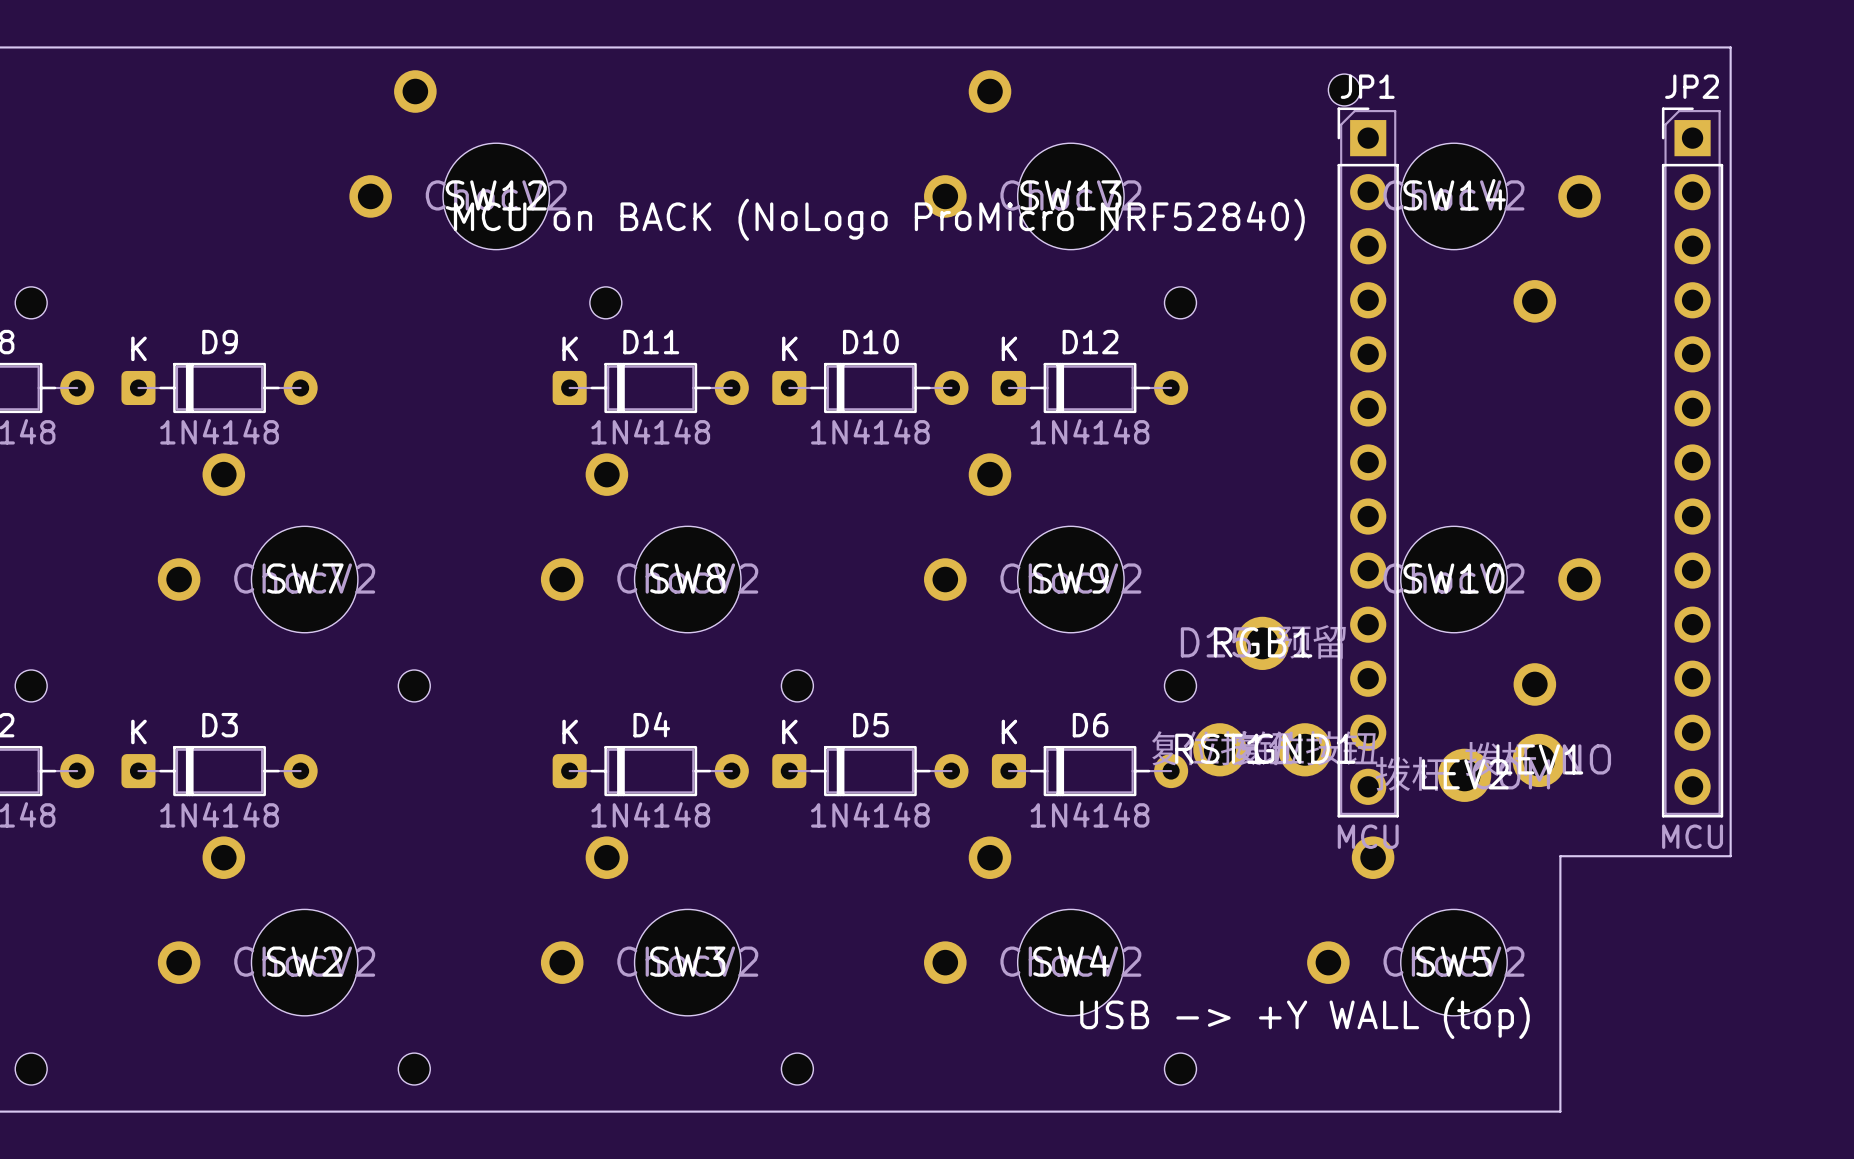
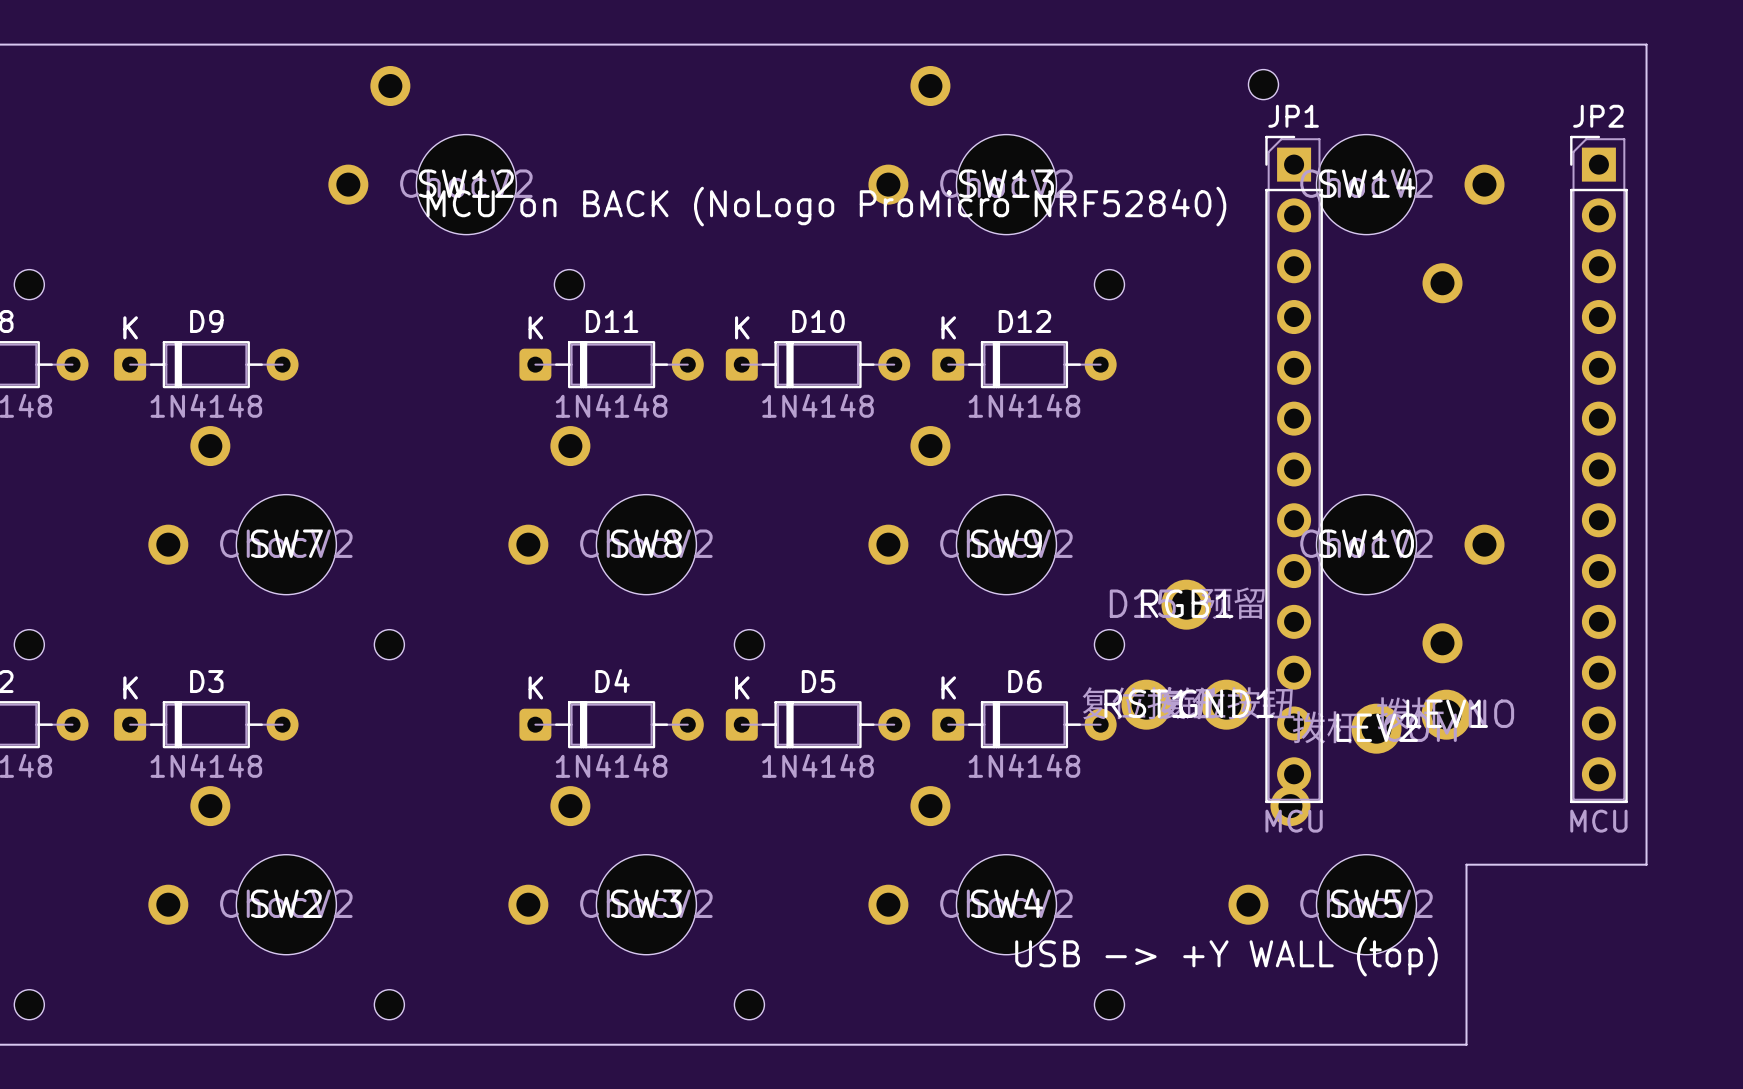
board edge: (1730, 47) (1730, 856) (1560, 856) (1560, 920) -> (1626, 44) (1646, 44) (1646, 864) (1466, 864)
JP1 position: (1368, 462) -> (1294, 469)
JP2 position: (1692, 462) -> (1598, 469)

